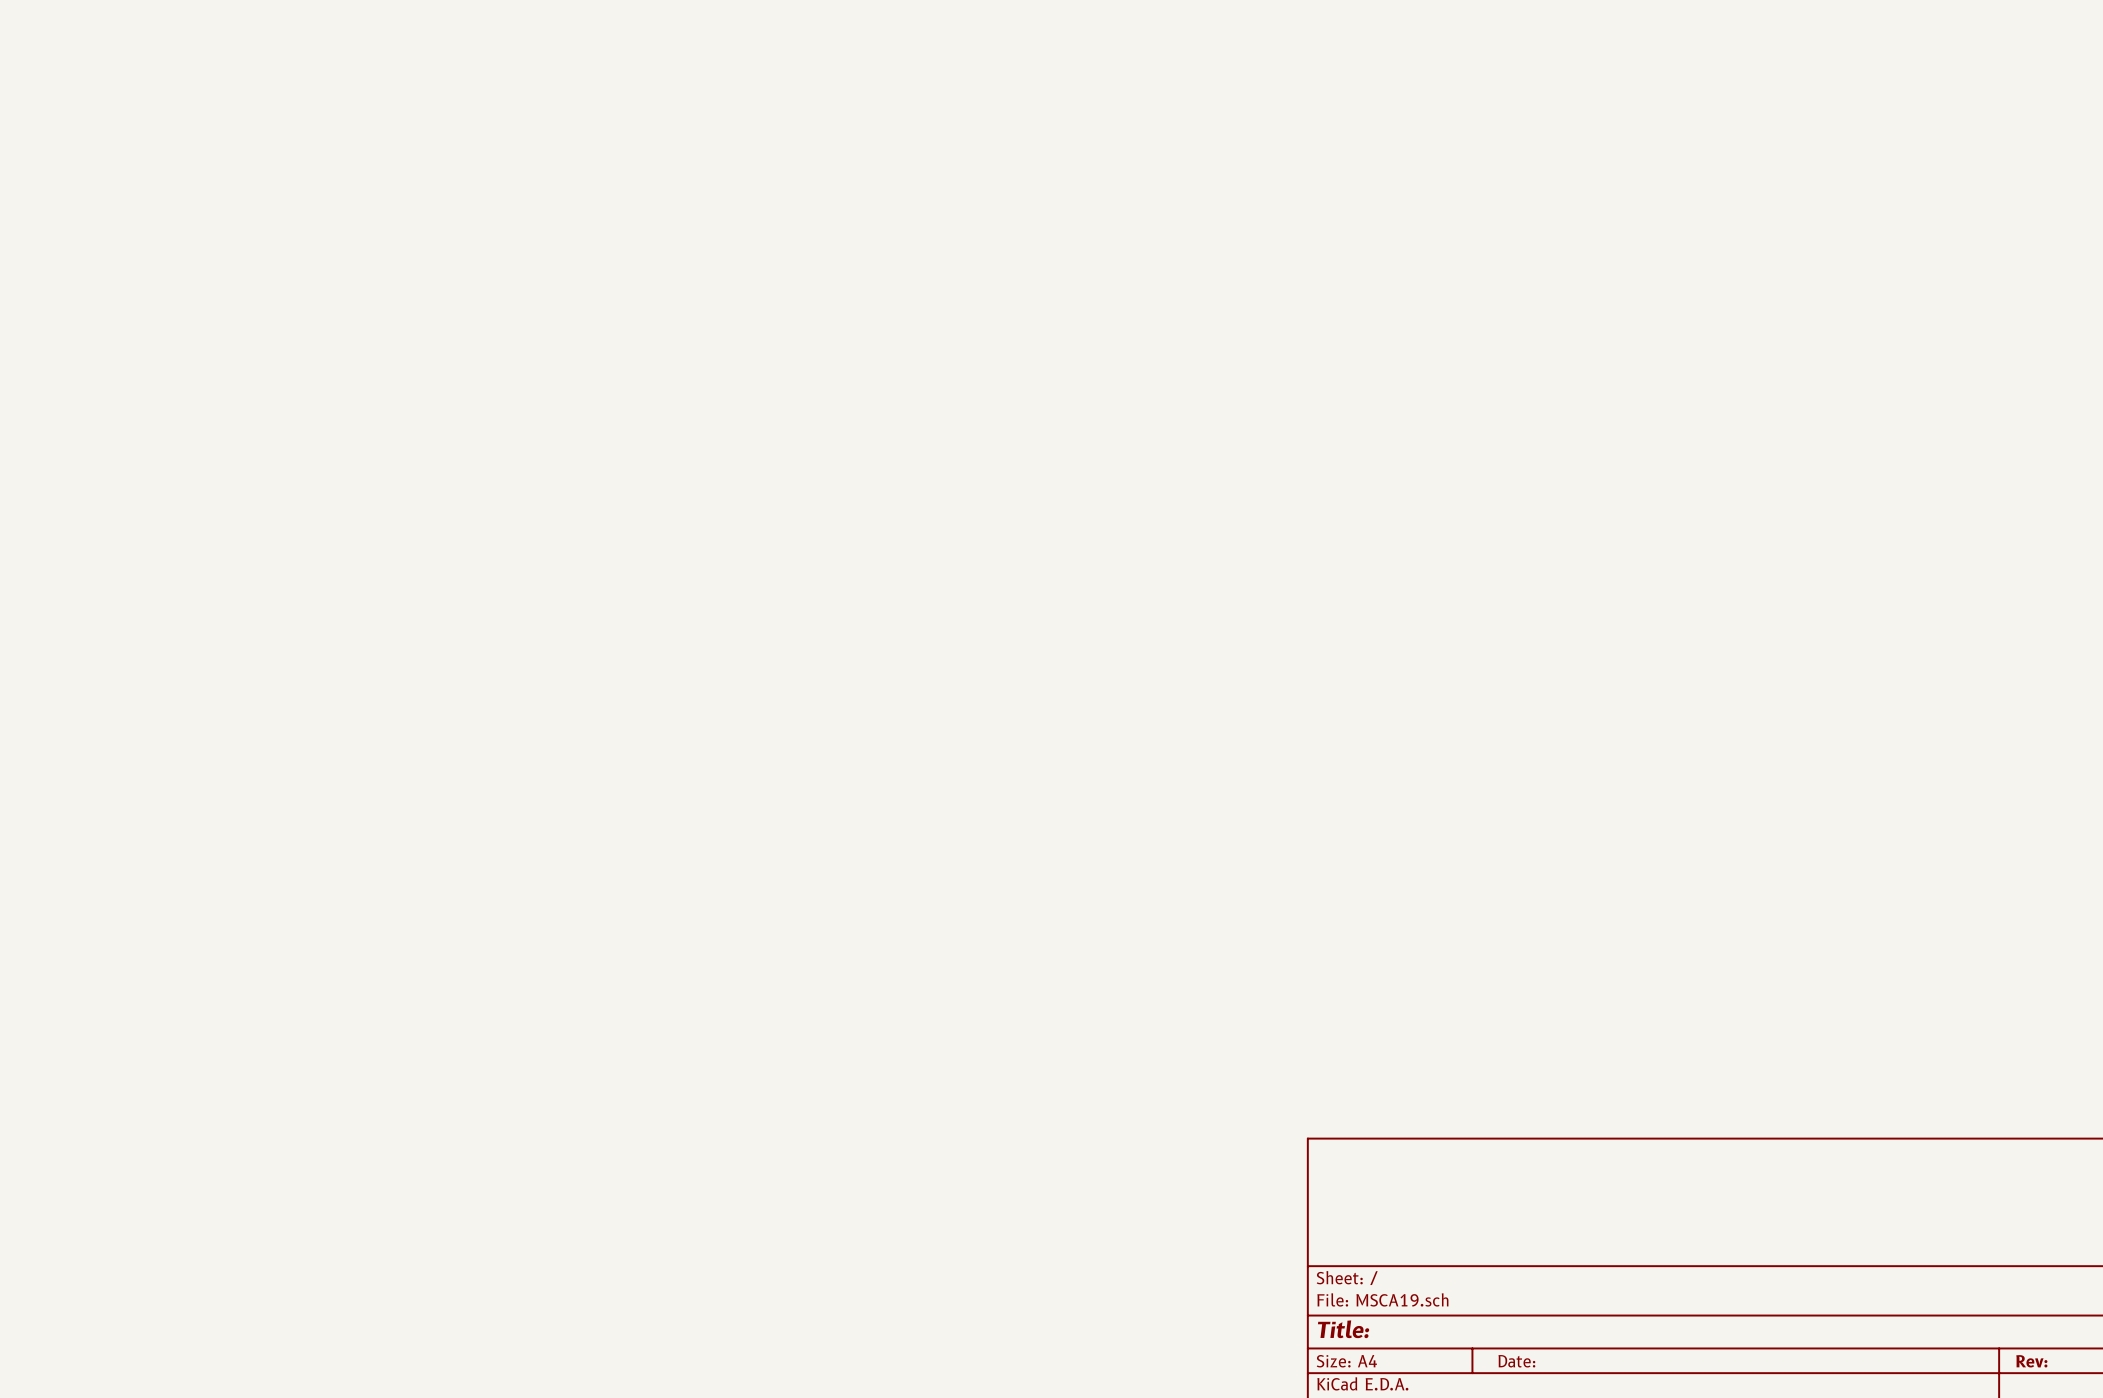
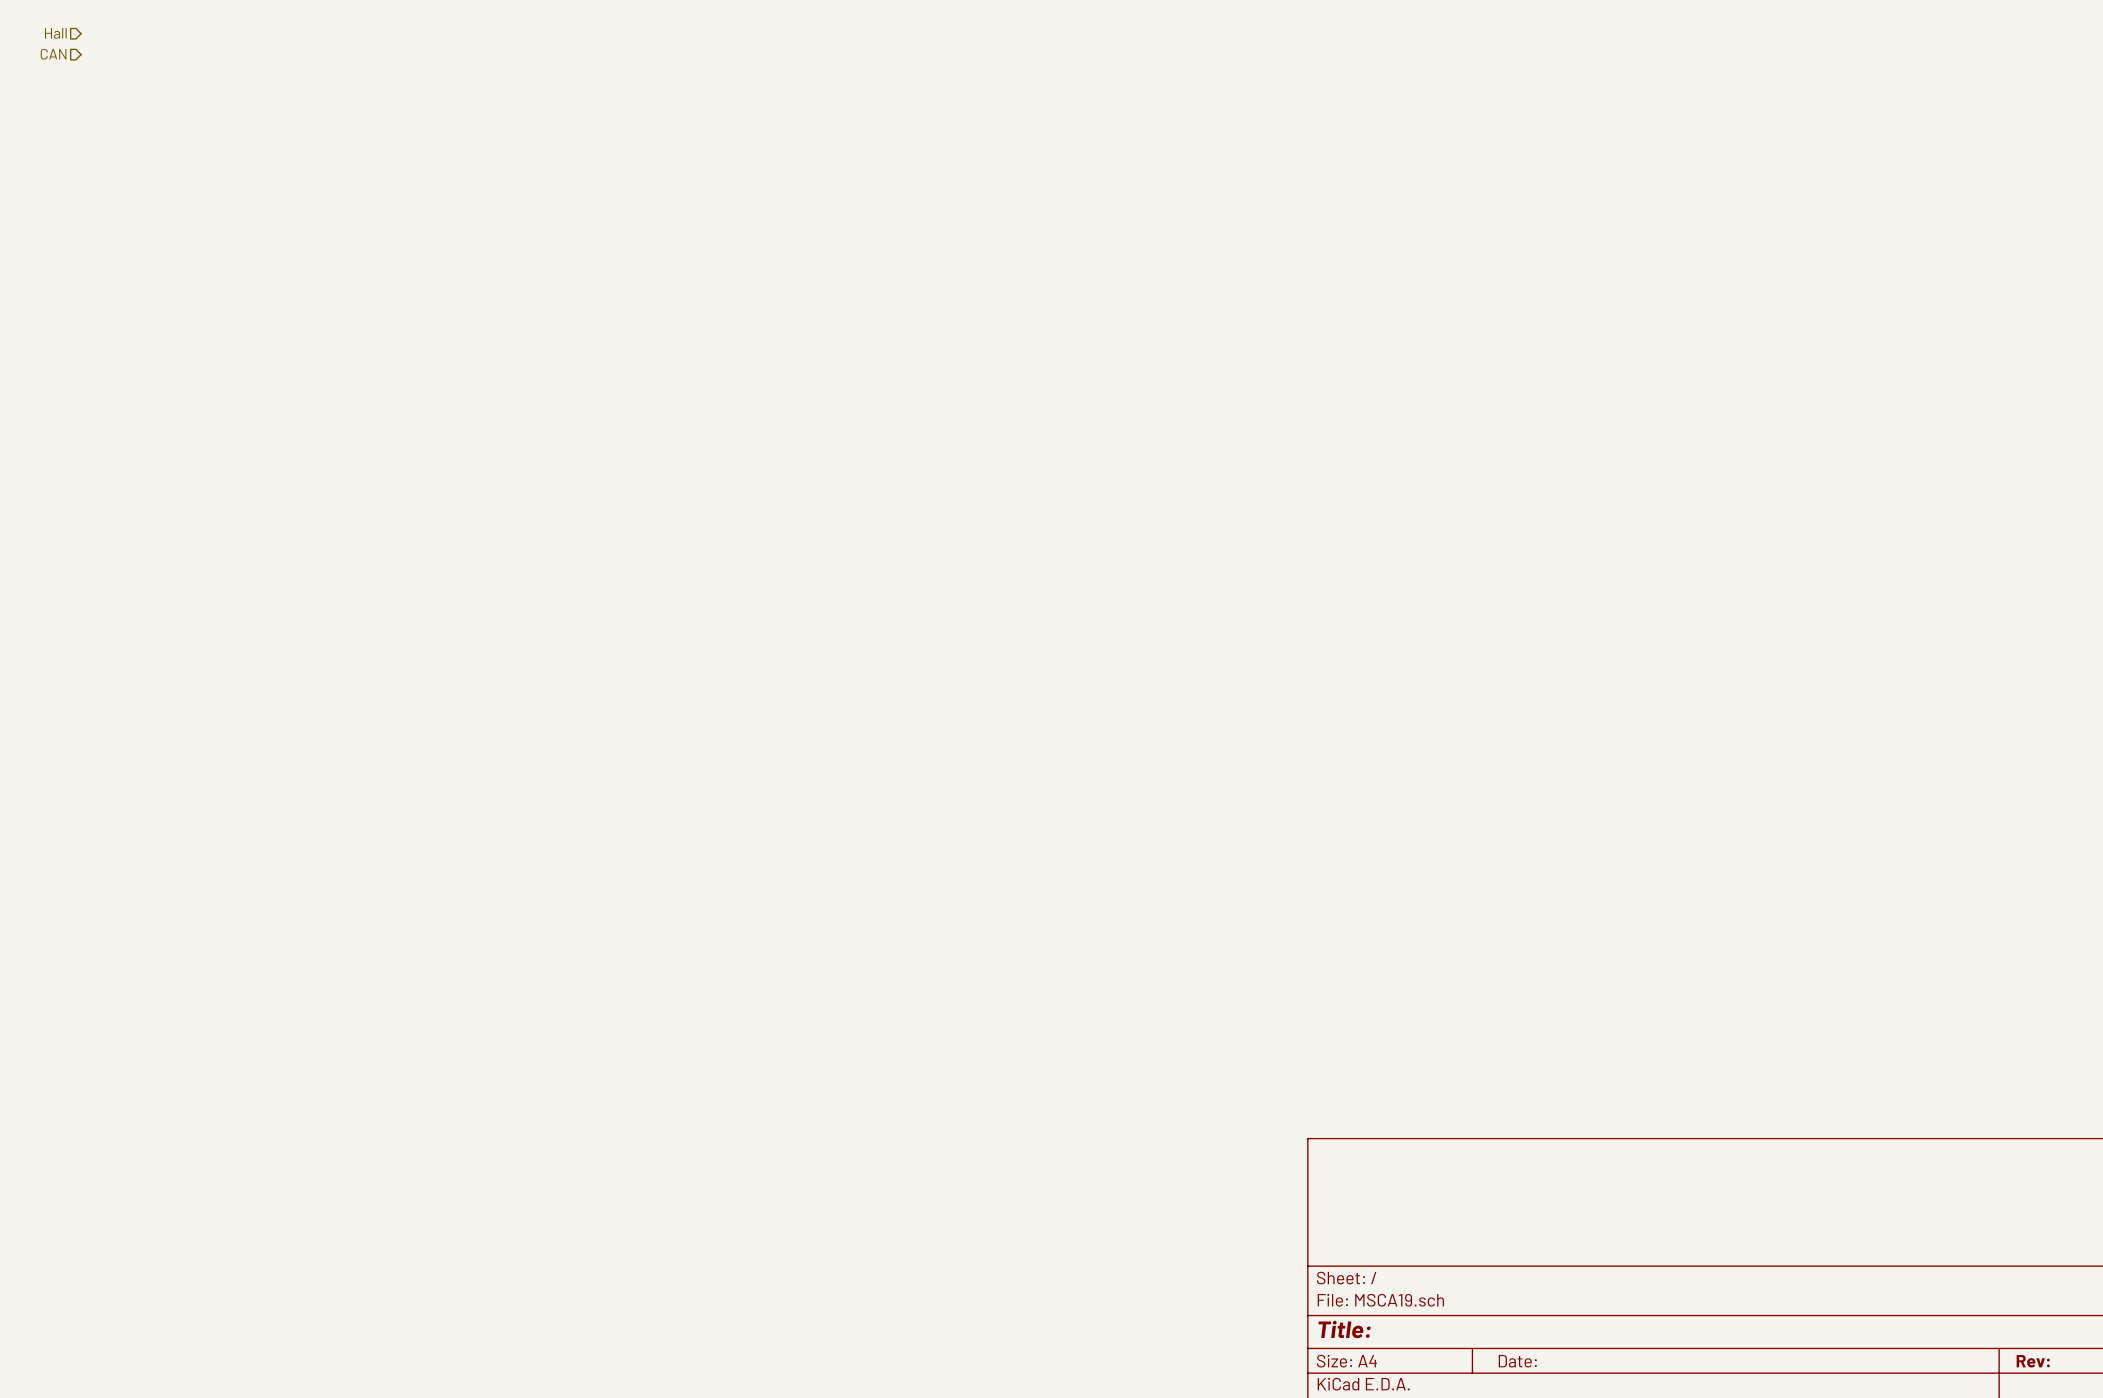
hierarchical label: none -> Hall (55, 33)
hierarchical label: none -> CAN (53, 54)

